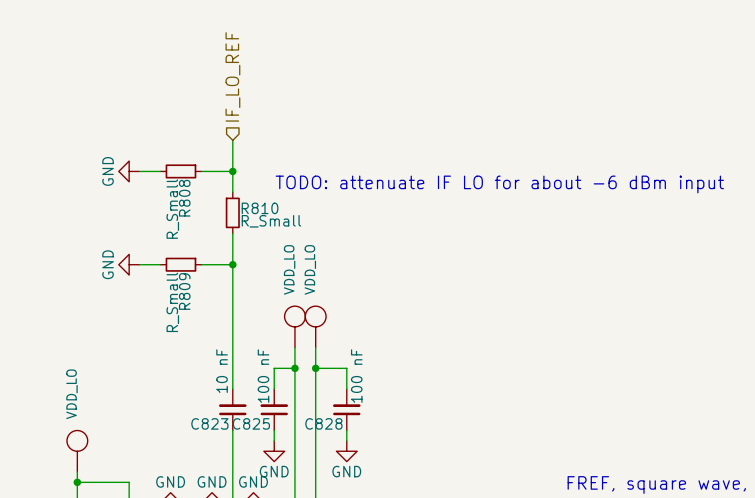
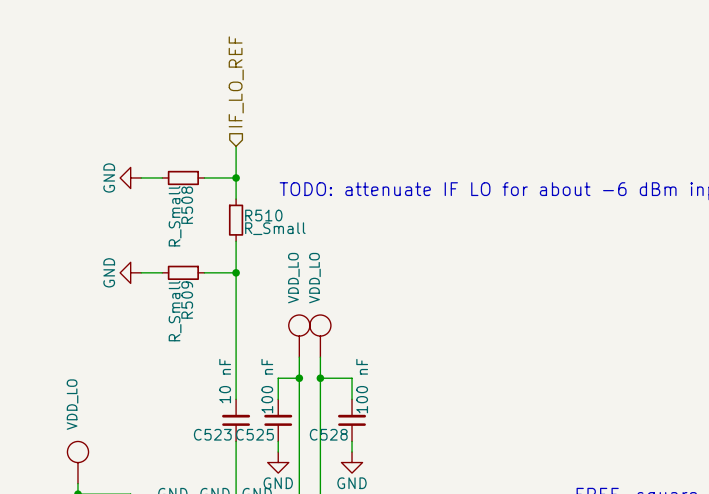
R808 name: R808 (184, 198) -> R508 (187, 205)
R810 name: R810 (260, 208) -> R510 (263, 215)
R809 name: R809 (184, 291) -> R509 (187, 300)
C823 name: C823 (209, 423) -> C523 (212, 434)
C825 name: C825 (251, 423) -> C525 (254, 434)
C828 name: C828 (323, 423) -> C528 (328, 434)

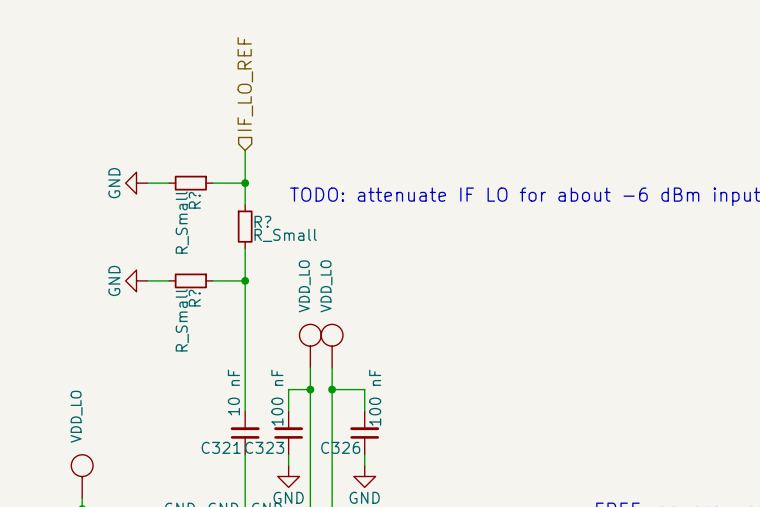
R508 name: R508 (187, 205) -> R? (194, 200)
R510 name: R510 (263, 215) -> R? (262, 221)
R509 name: R509 (187, 300) -> R? (194, 298)
C523 name: C523 (212, 434) -> C321 (221, 447)
C525 name: C525 (254, 434) -> C323 (264, 447)
C528 name: C528 (328, 434) -> C326 (340, 447)

